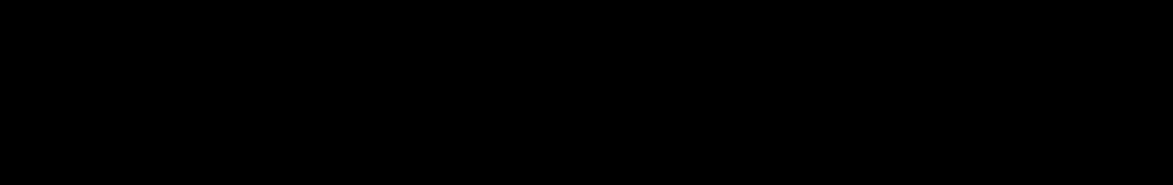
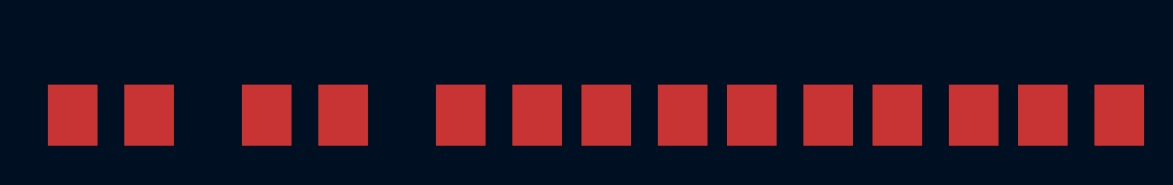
part: none -> (110, 115)
part: none -> (304, 115)
part: none -> (498, 115)
part: none -> (644, 115)
part: none -> (789, 115)
part: none -> (935, 115)
part: none -> (1081, 115)

